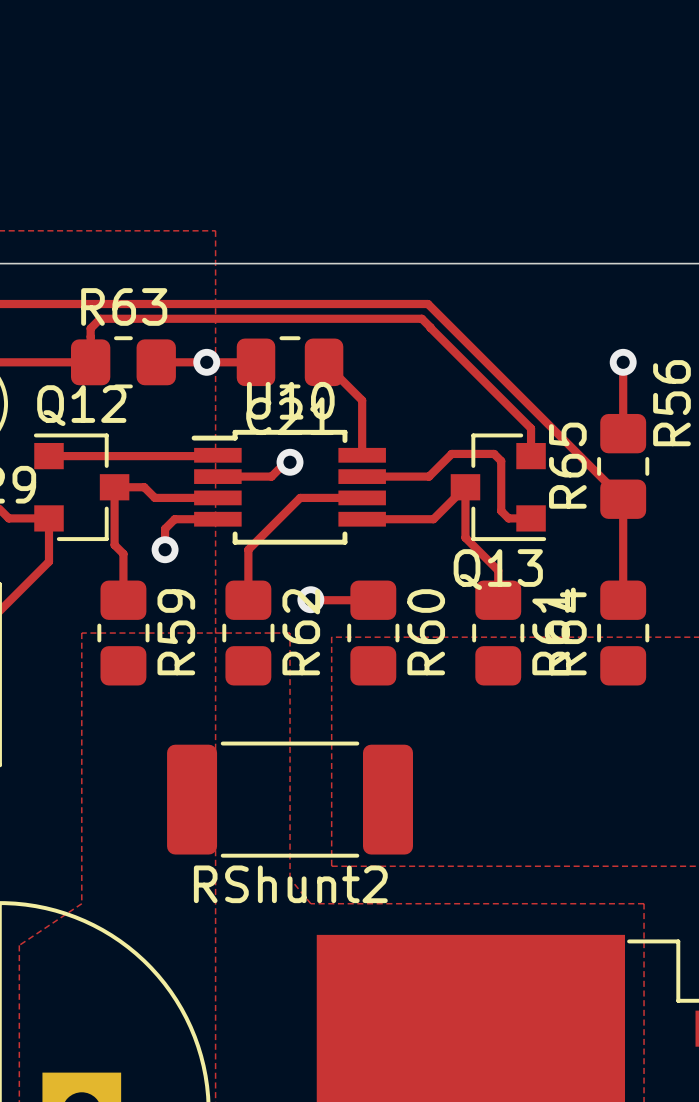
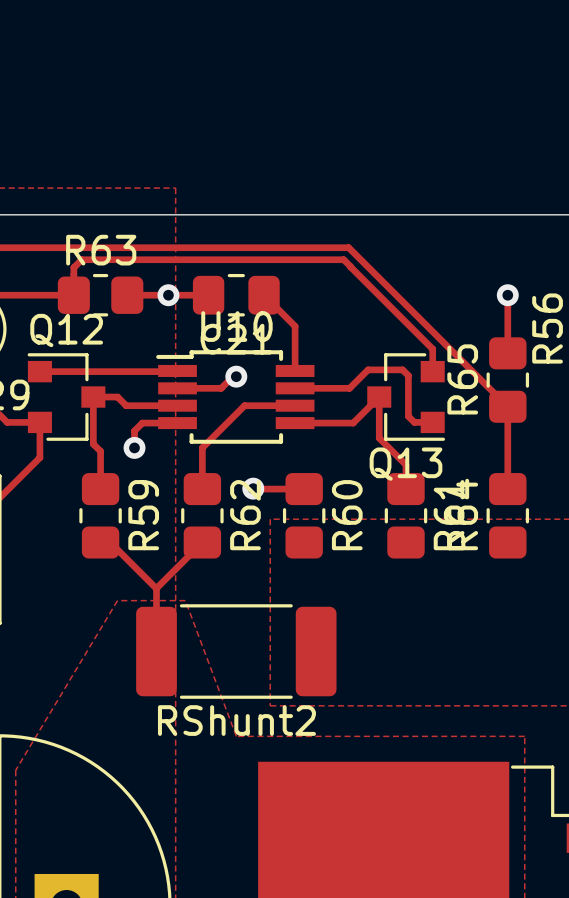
track: none -> (110, 542) (156, 588)
track: none -> (202, 542) (156, 588) (156, 651)
zone outline: (310, 903) (290, 878) (290, 633) (81, 633) (81, 903) (19, 945) -> (253, 736) (236, 736) (185, 600) (117, 600) (15, 770)

